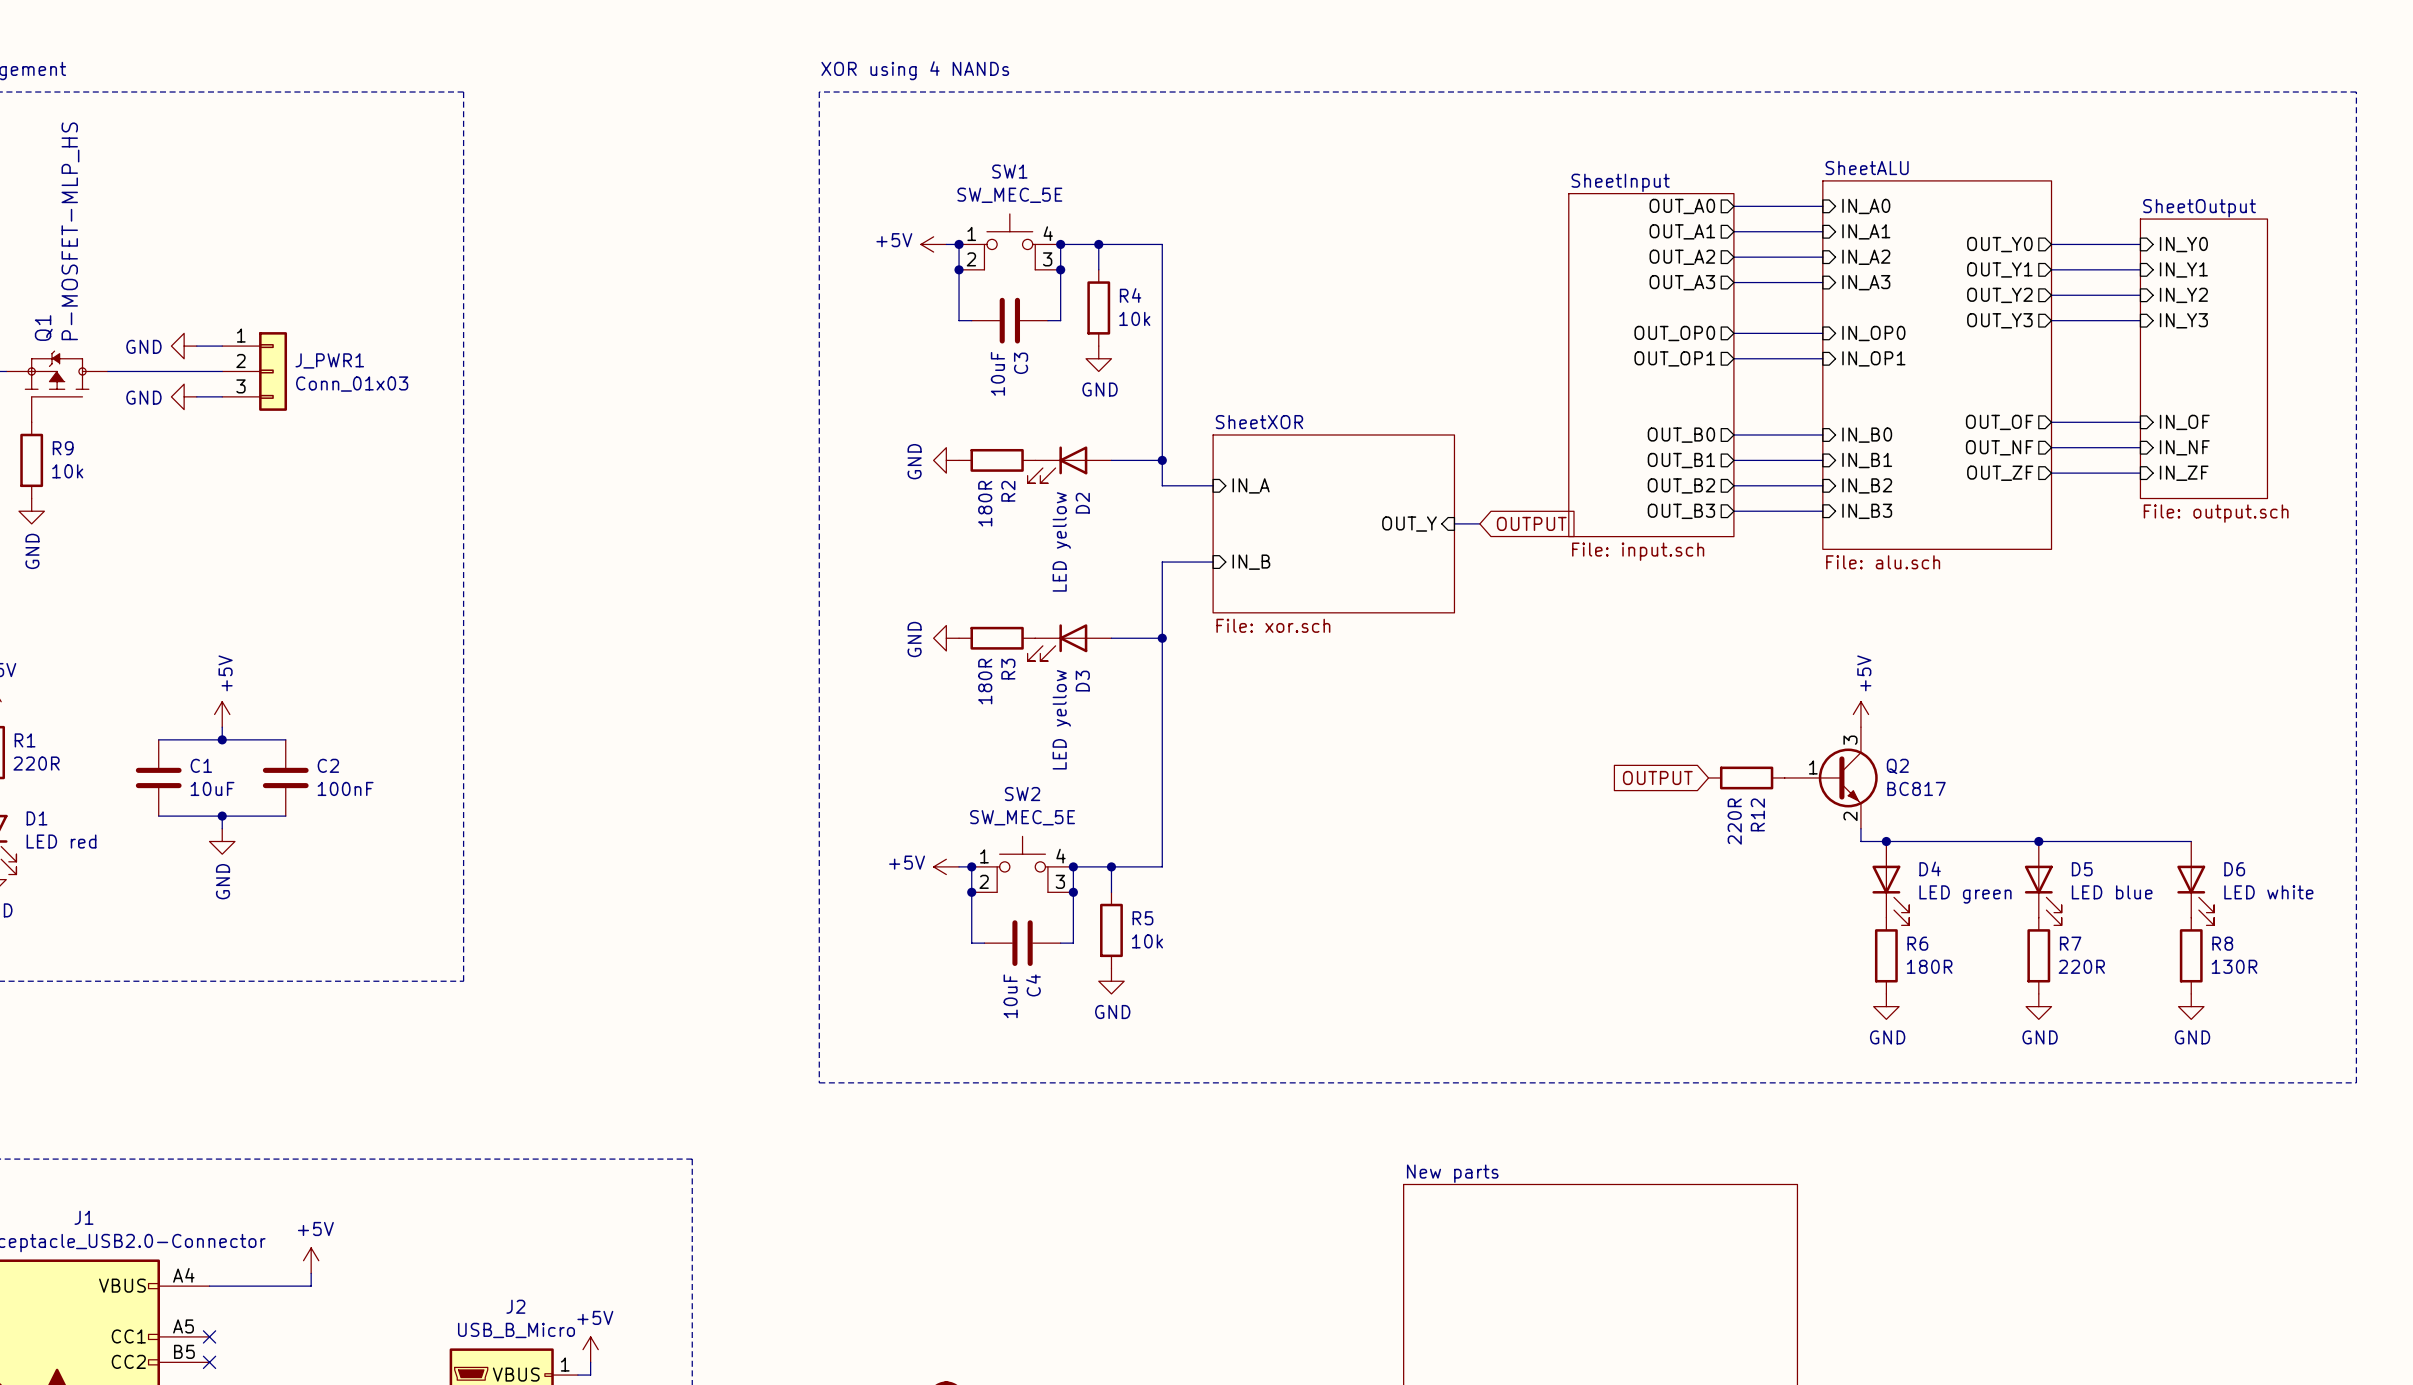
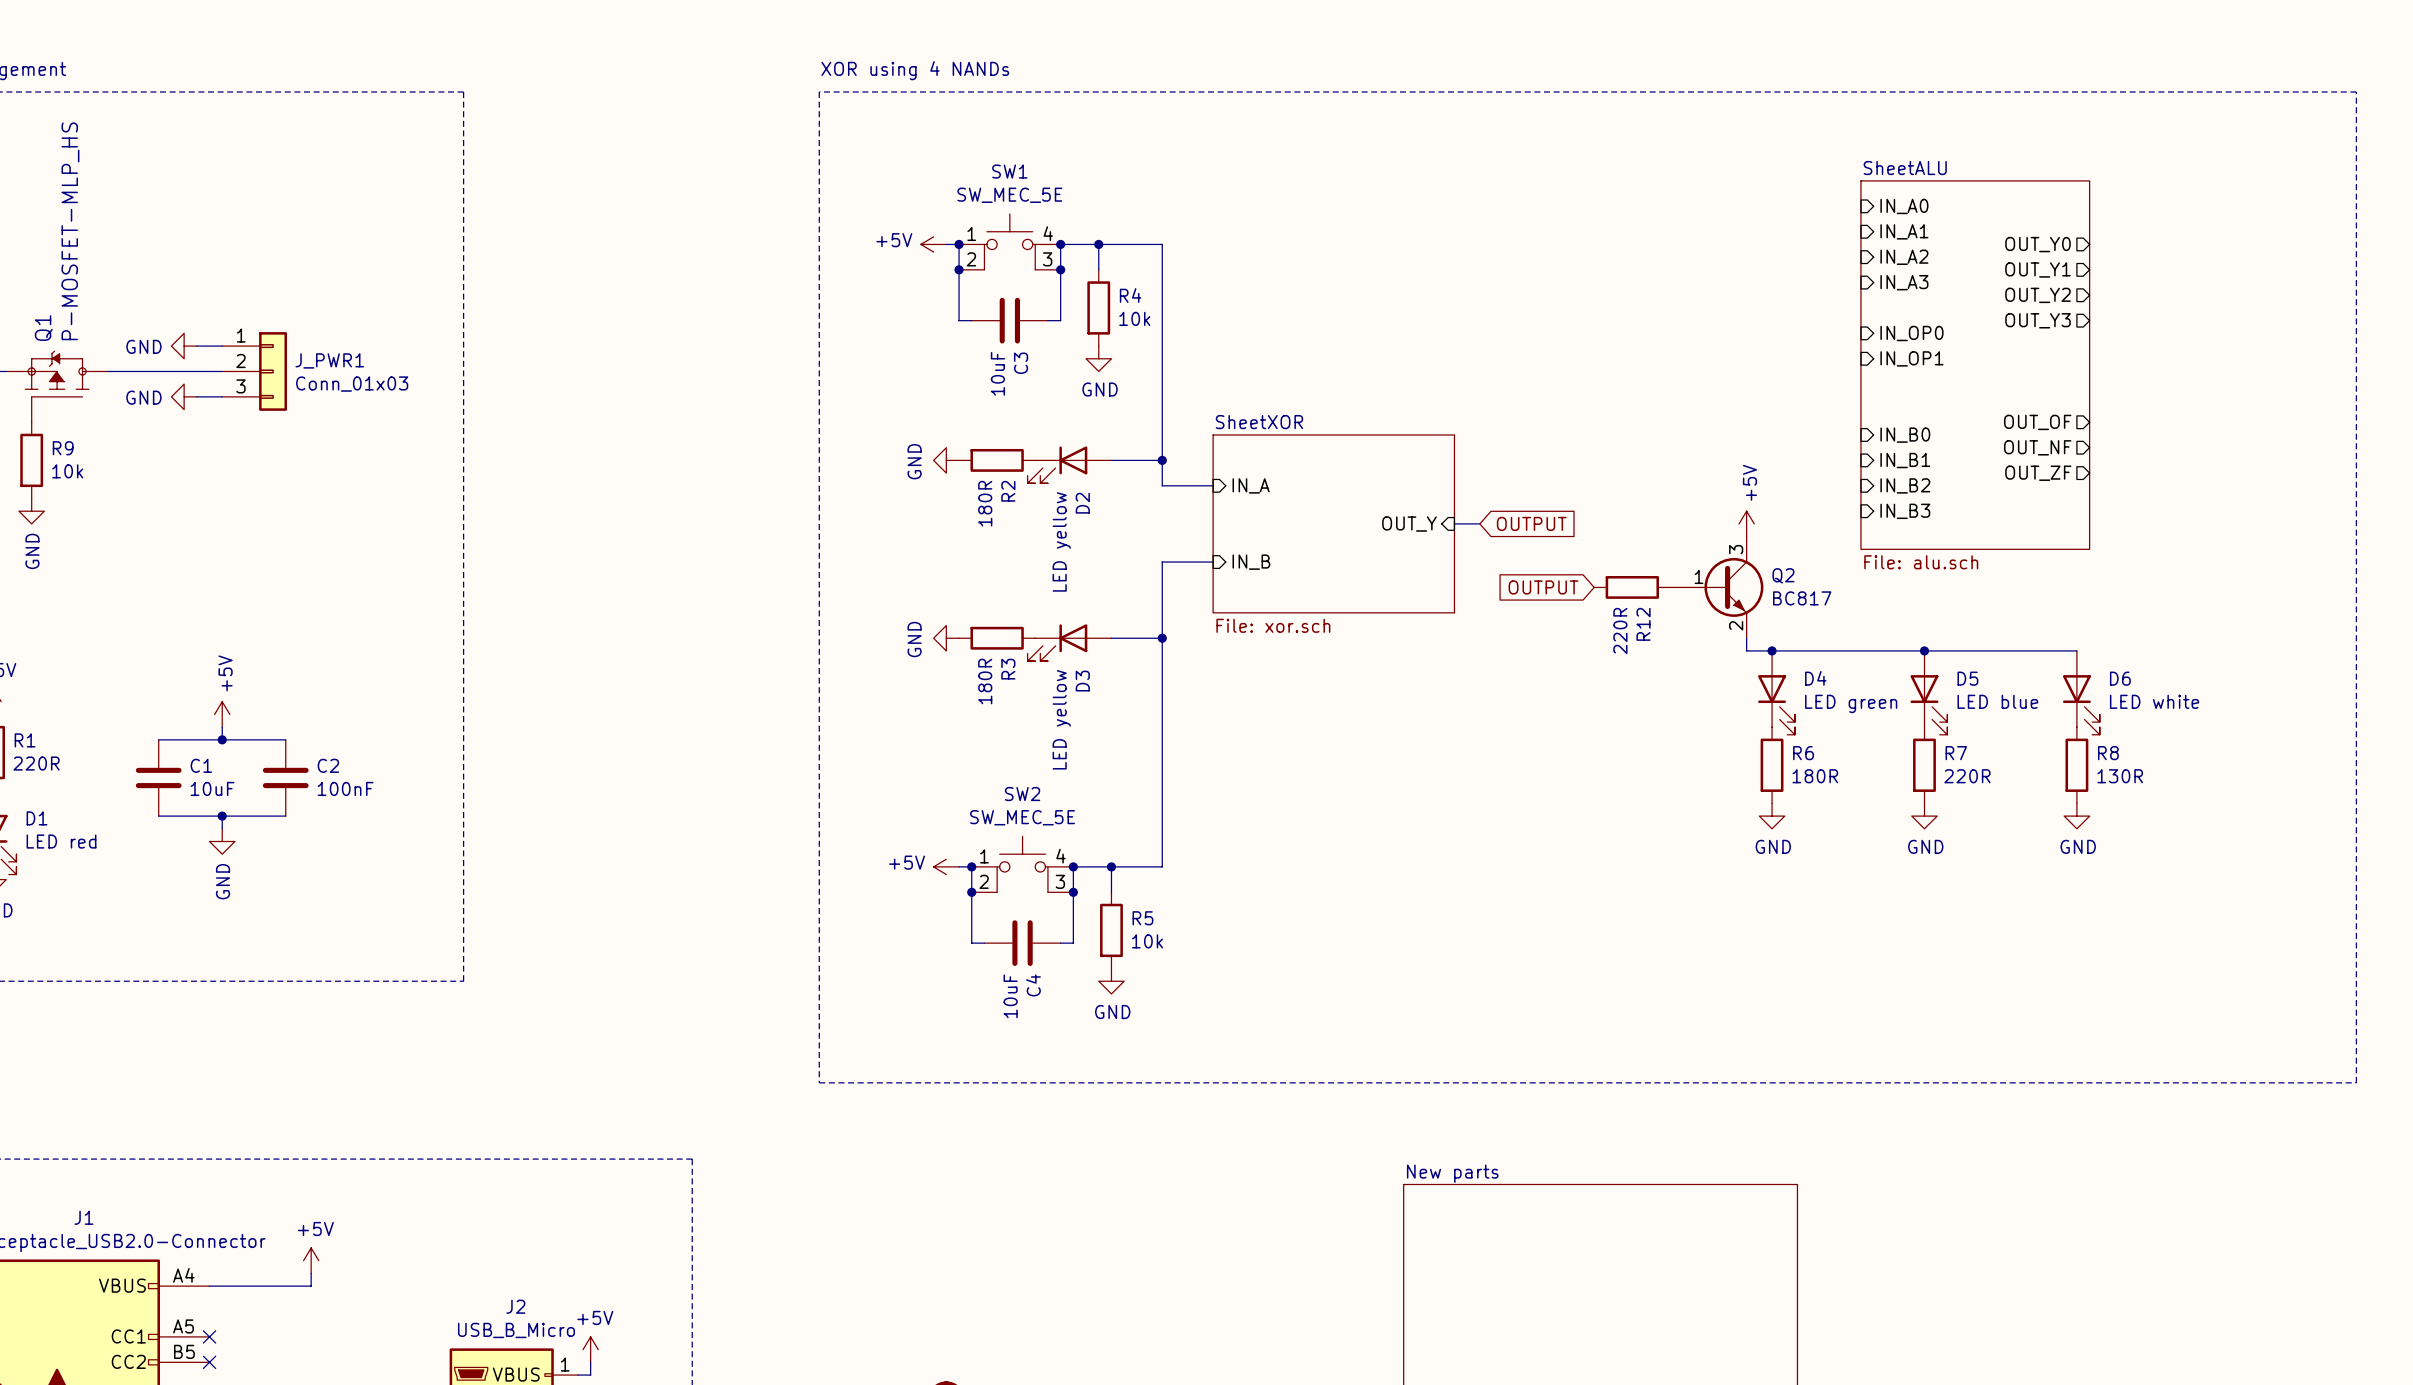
sheet pin: OUT_A0 (1682, 206) -> none
wire: (1733, 206) (1822, 206) -> none
sheet pin position: IN_A0 (1866, 206) -> IN_A0 (1904, 206)
sheet pin: OUT_A1 (1682, 231) -> none
wire: (1733, 231) (1822, 231) -> none
sheet pin position: IN_A1 (1866, 231) -> IN_A1 (1904, 231)
sheet pin position: OUT_Y0 (1999, 244) -> OUT_Y0 (2038, 244)
wire: (2051, 244) (2140, 244) -> none
sheet pin: IN_Y0 (2183, 244) -> none
sheet pin: OUT_A2 (1682, 257) -> none
wire: (1733, 257) (1822, 257) -> none
sheet pin position: IN_A2 (1866, 257) -> IN_A2 (1904, 257)
sheet pin position: OUT_Y1 (1999, 269) -> OUT_Y1 (2038, 269)
wire: (2051, 269) (2140, 269) -> none
sheet pin: IN_Y1 (2183, 269) -> none
sheet pin: OUT_A3 (1682, 282) -> none
wire: (1733, 282) (1822, 282) -> none
sheet pin position: IN_A3 (1866, 282) -> IN_A3 (1904, 282)
sheet pin position: OUT_Y2 (1999, 295) -> OUT_Y2 (2038, 295)
wire: (2051, 295) (2140, 295) -> none
sheet pin: IN_Y2 (2183, 295) -> none
sheet pin position: OUT_Y3 (1999, 320) -> OUT_Y3 (2038, 320)
wire: (2051, 320) (2140, 320) -> none
sheet pin: IN_Y3 (2183, 320) -> none
sheet pin: OUT_OP0 (1674, 333) -> none
wire: (1733, 333) (1822, 333) -> none
sheet pin position: IN_OP0 (1873, 333) -> IN_OP0 (1911, 333)
sheet pin: OUT_OP1 (1674, 358) -> none
wire: (1733, 358) (1822, 358) -> none
sheet pin position: IN_OP1 (1873, 358) -> IN_OP1 (1911, 358)
sheet SheetOutput: File: output.sch (2203, 358) -> none
sheet SheetInput: File: input.sch (1651, 365) -> none
sheet SheetALU position: (1937, 365) -> (1975, 365)
sheet pin position: OUT_OF (1999, 422) -> OUT_OF (2037, 422)
wire: (2051, 422) (2140, 422) -> none
sheet pin: IN_OF (2184, 422) -> none
wire: (1733, 434) (1822, 434) -> none
sheet pin: OUT_B0 (1681, 435) -> none
sheet pin position: IN_B0 (1867, 435) -> IN_B0 (1905, 435)
sheet pin position: OUT_NF (1999, 447) -> OUT_NF (2037, 447)
wire: (2051, 447) (2140, 447) -> none
sheet pin: IN_NF (2184, 447) -> none
sheet pin: OUT_B1 (1681, 460) -> none
wire: (1733, 460) (1822, 460) -> none
sheet pin position: IN_B1 (1867, 460) -> IN_B1 (1905, 460)
sheet pin position: OUT_ZF (2000, 473) -> OUT_ZF (2038, 473)
wire: (2051, 473) (2140, 473) -> none
sheet pin: IN_ZF (2184, 473) -> none
sheet pin: OUT_B2 (1681, 485) -> none
wire: (1733, 485) (1822, 485) -> none
sheet pin position: IN_B2 (1867, 485) -> IN_B2 (1905, 485)
sheet pin: OUT_B3 (1681, 511) -> none
wire: (1733, 511) (1822, 511) -> none
sheet pin position: IN_B3 (1867, 511) -> IN_B3 (1905, 511)
junction: none -> (1772, 650)
junction: none -> (1924, 650)
power symbol position: +5V (1860, 714) -> +5V (1746, 523)
global label position: OUTPUT (1657, 777) -> OUTPUT (1543, 587)
R12 position: (1746, 777) -> (1632, 587)
Q2 position: (1831, 777) -> (1716, 587)
power symbol: none -> GND (1772, 816)
power symbol: none -> GND (1924, 816)
power symbol: none -> GND (2076, 816)
wire: (1860, 828) (1860, 841) (2191, 841) -> (1746, 638) (1746, 650) (2076, 650)
junction: (1886, 841) -> none
junction: (2038, 841) -> none
D4 position: (1890, 883) -> (1776, 692)
D5 position: (2043, 883) -> (1928, 692)
D6 position: (2195, 883) -> (2081, 692)
R6 position: (1886, 955) -> (1772, 765)
R7 position: (2038, 955) -> (1924, 765)
R8 position: (2191, 955) -> (2076, 765)
power symbol: GND (1886, 1006) -> none
power symbol: GND (2038, 1006) -> none
power symbol: GND (2191, 1006) -> none

